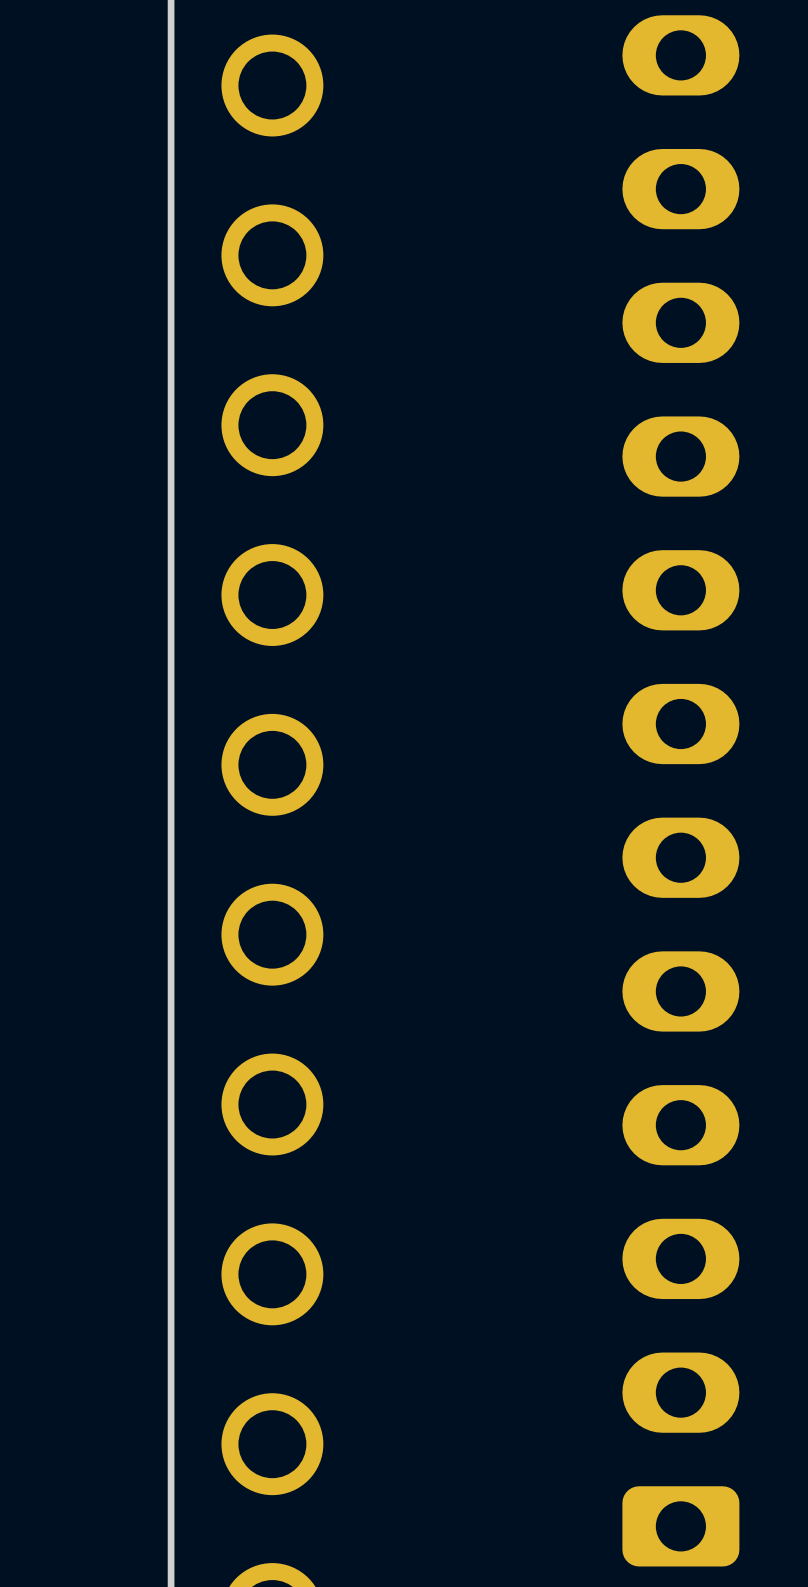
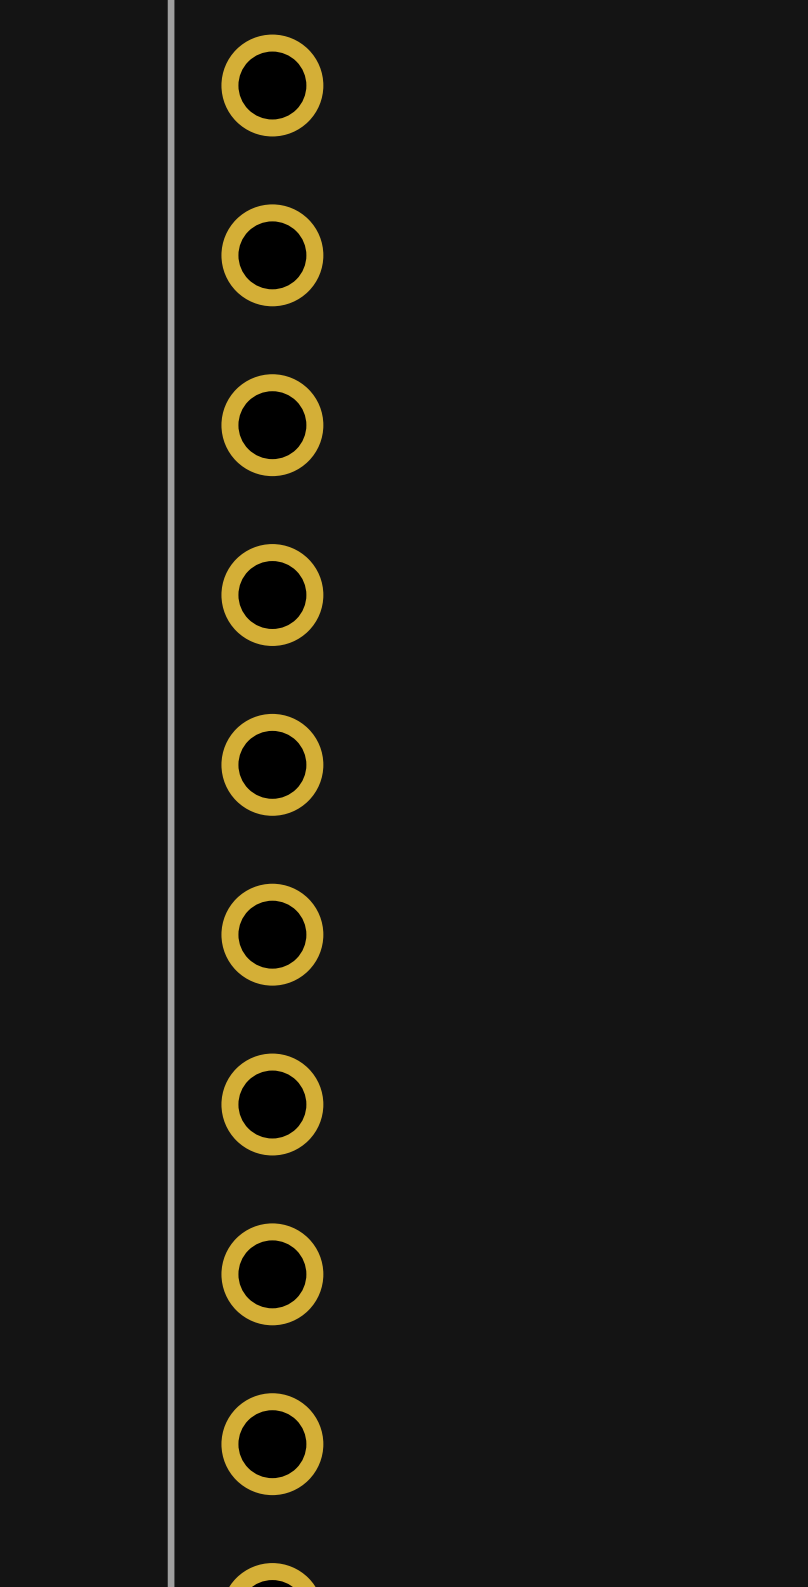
part: (680, 790) -> none

